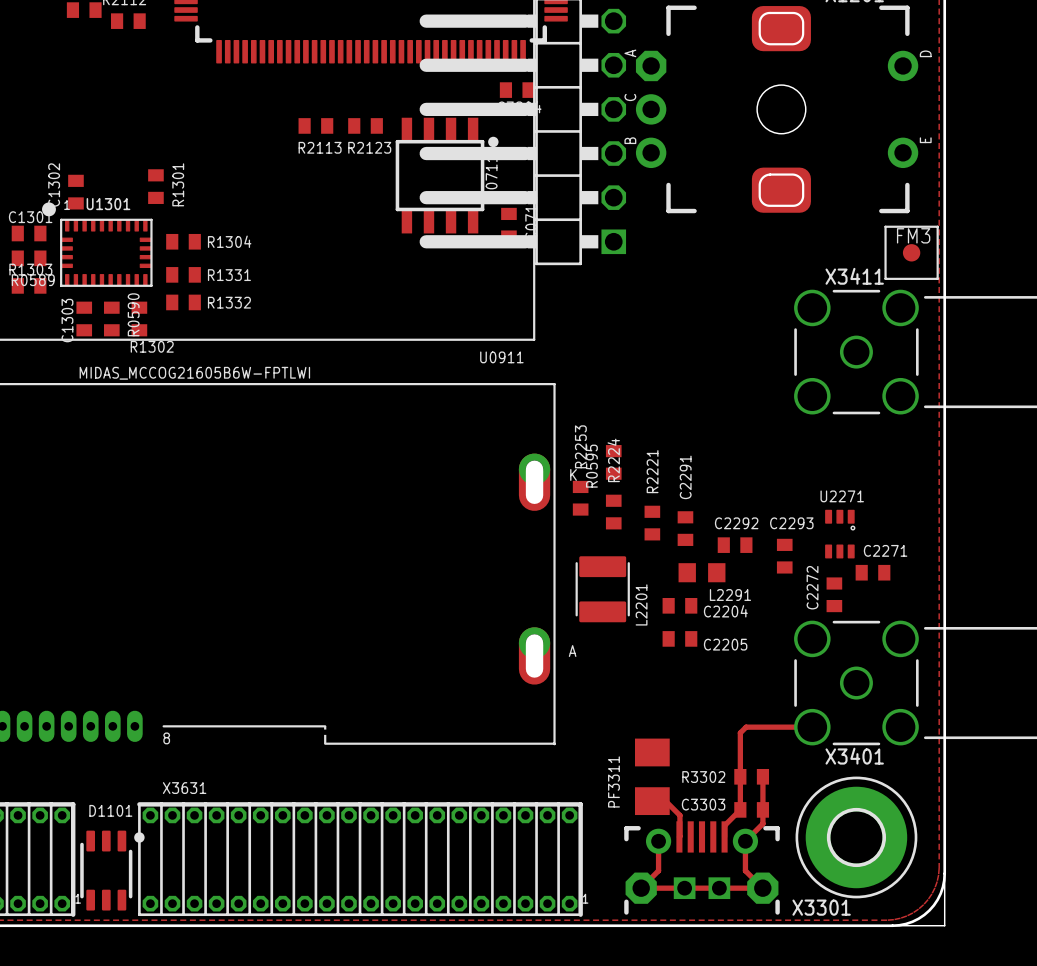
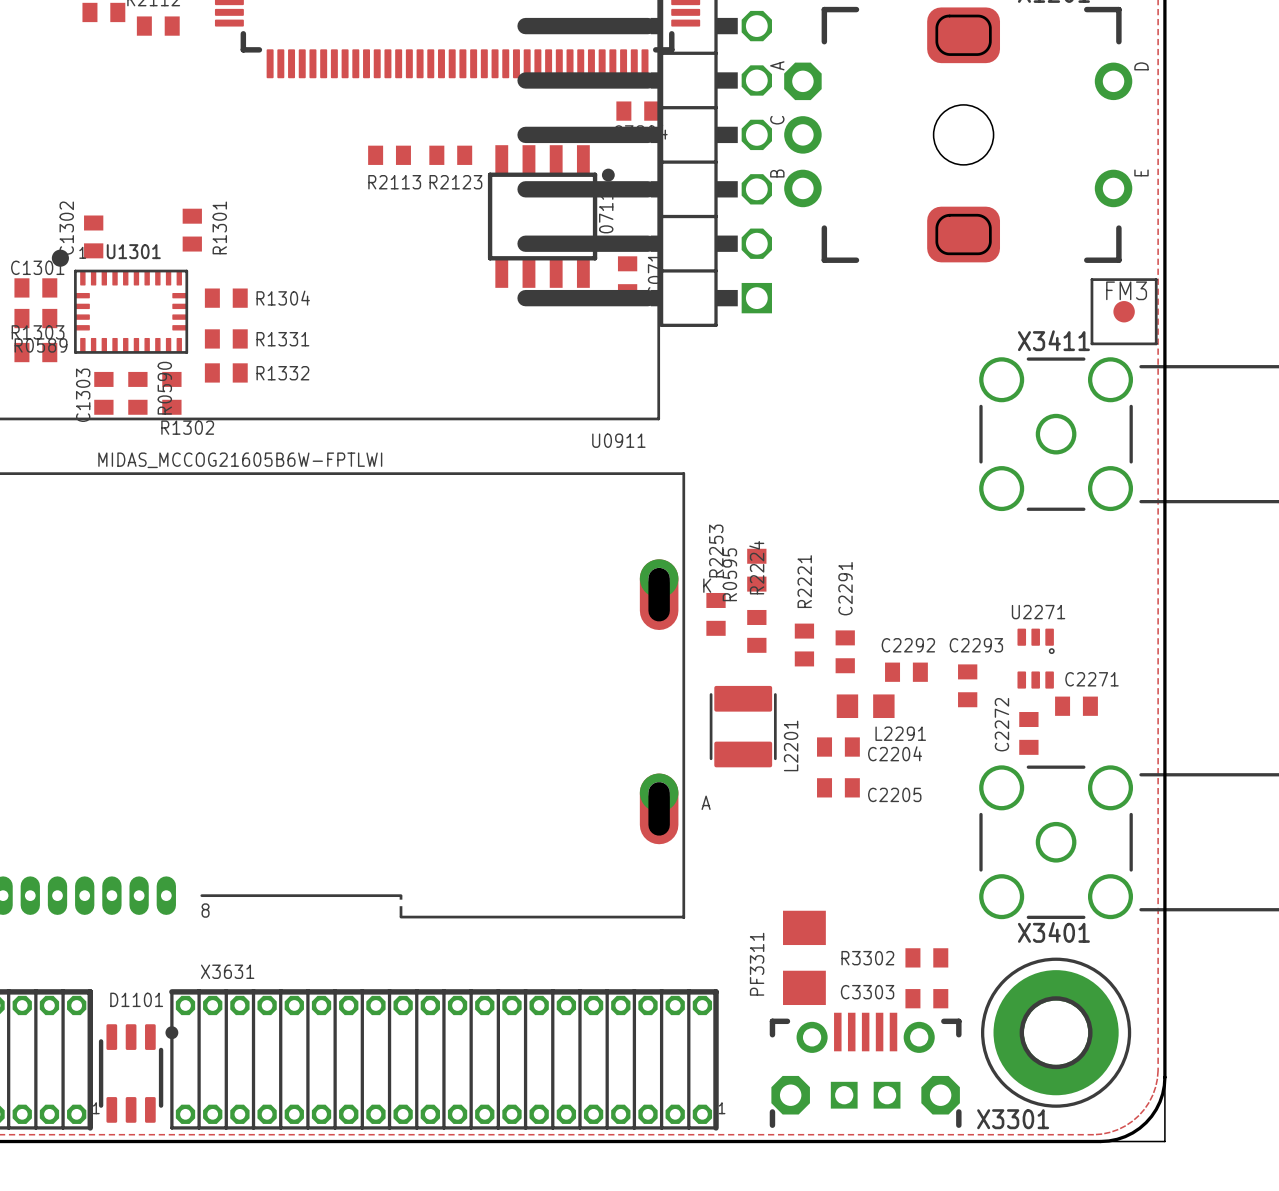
track: (812, 727) (746, 727) (740, 732) (740, 809) (724, 825) (724, 836) -> none
track: (762, 776) (762, 823) (745, 841) (745, 870) (762, 888) (641, 888) (658, 870) (658, 841) -> none
track: (652, 801) (665, 801) (679, 815) (679, 836) -> none

